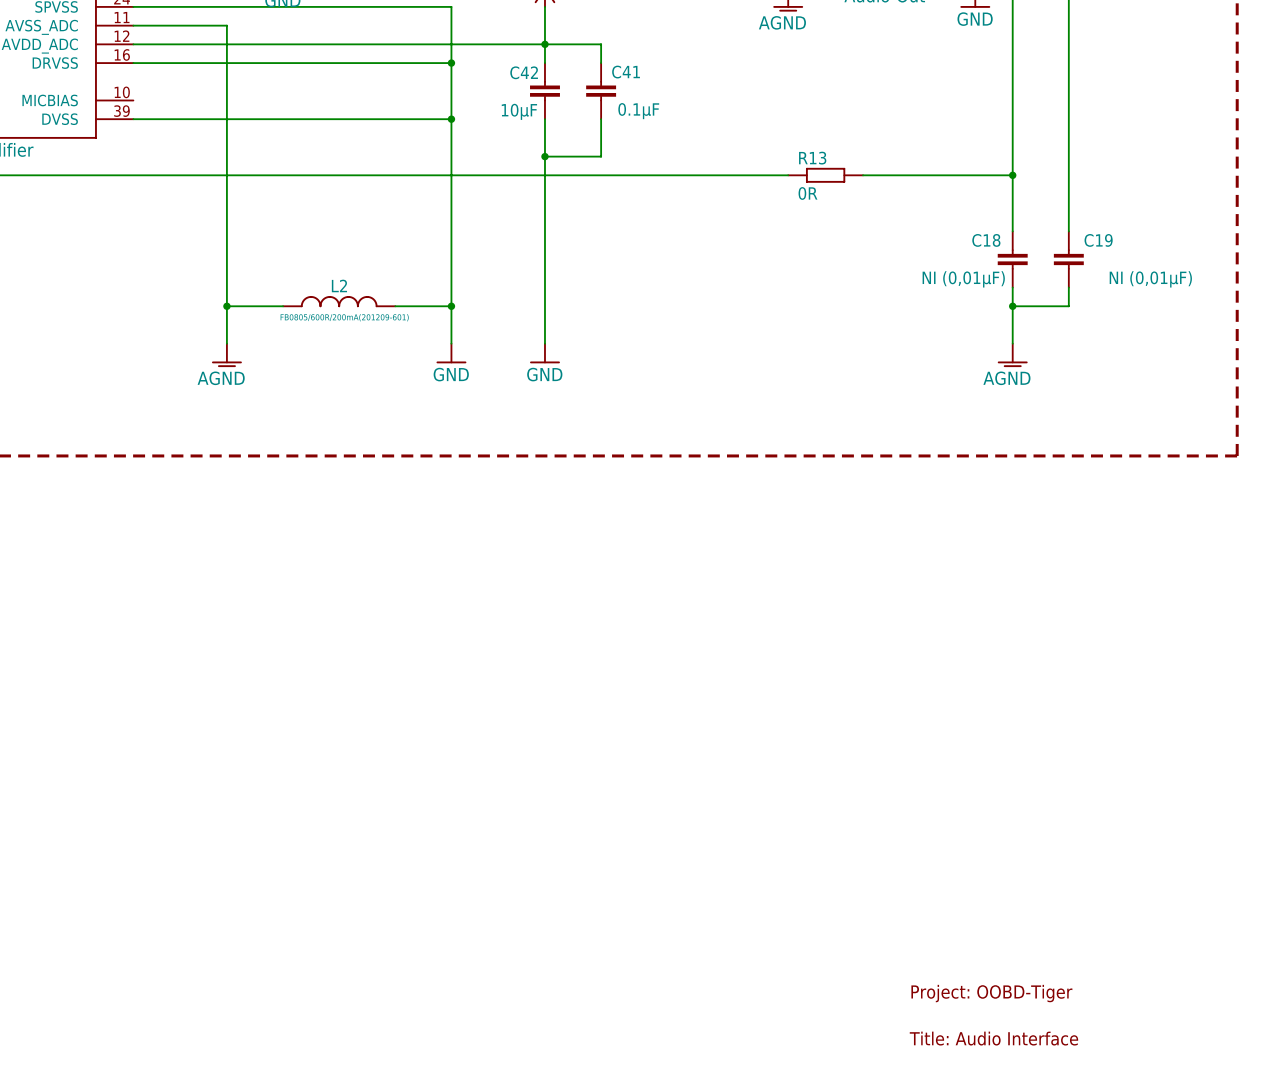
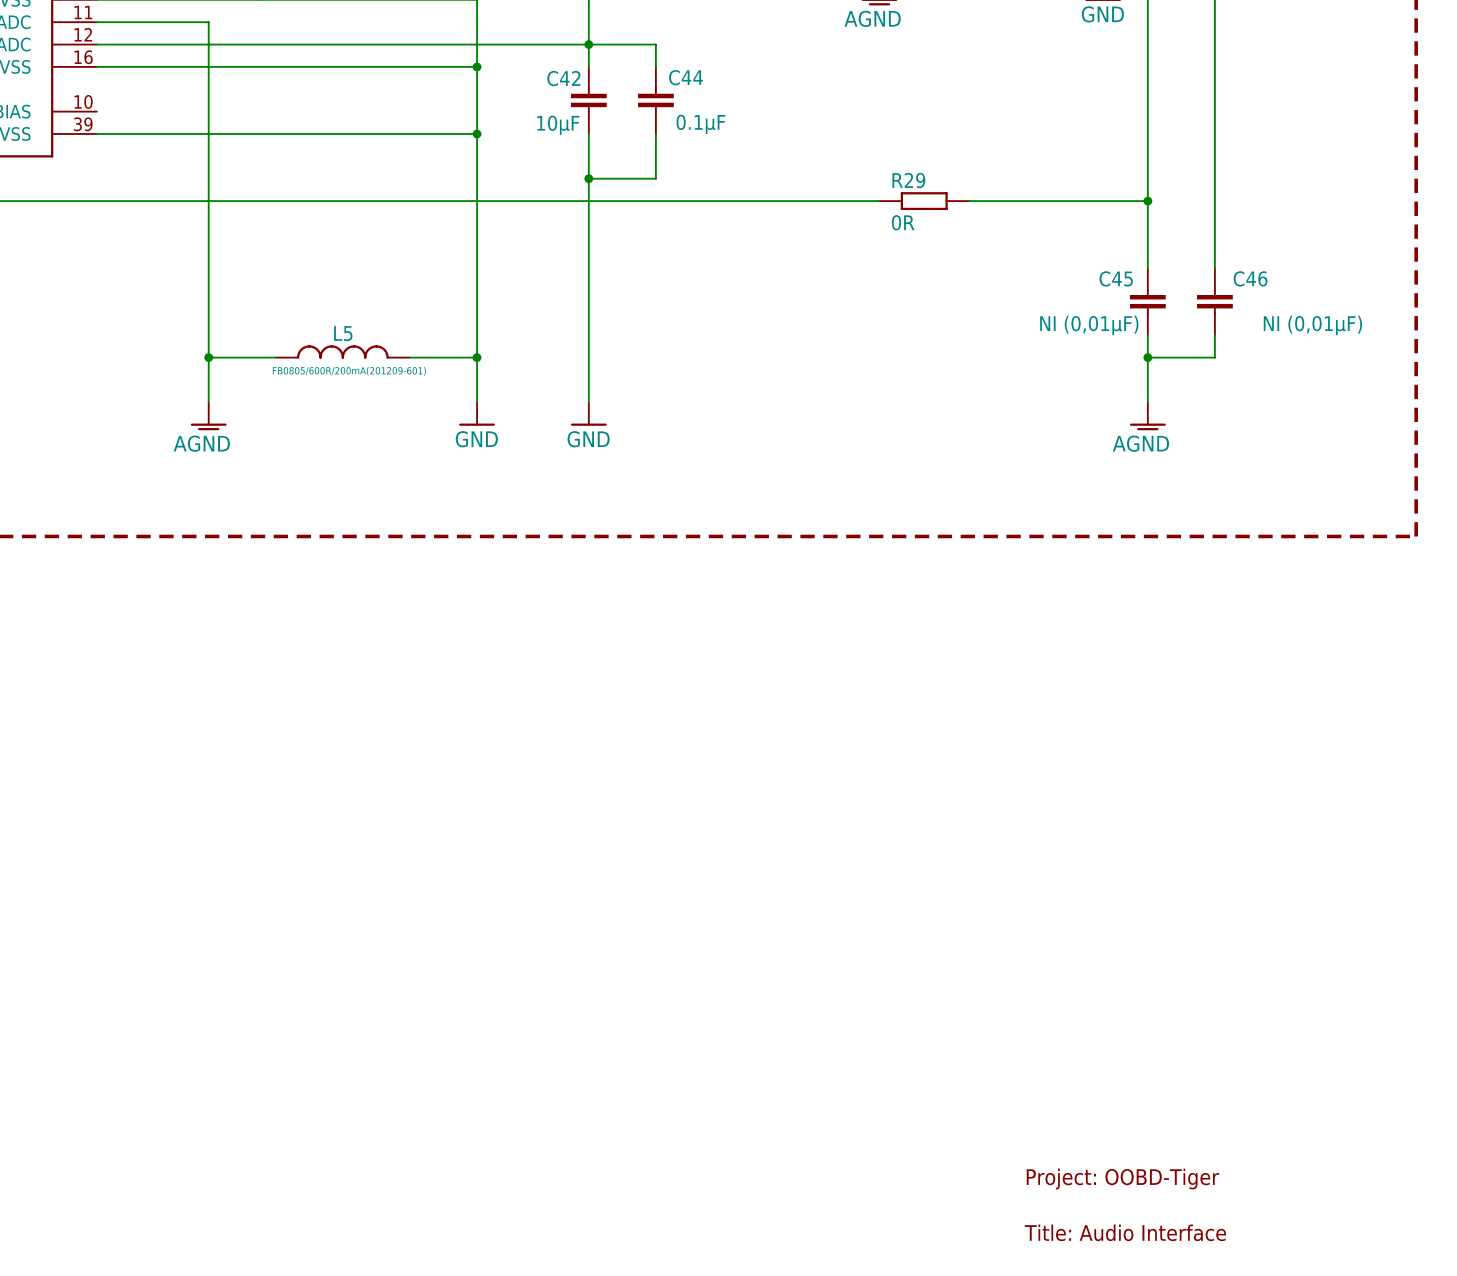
C41 name: C41 (626, 72) -> C44 (686, 77)
R13 name: R13 (812, 158) -> R29 (908, 180)
C18 name: C18 (986, 240) -> C45 (1116, 278)
C19 name: C19 (1098, 240) -> C46 (1250, 278)
L2 name: L2 (339, 285) -> L5 (343, 333)

